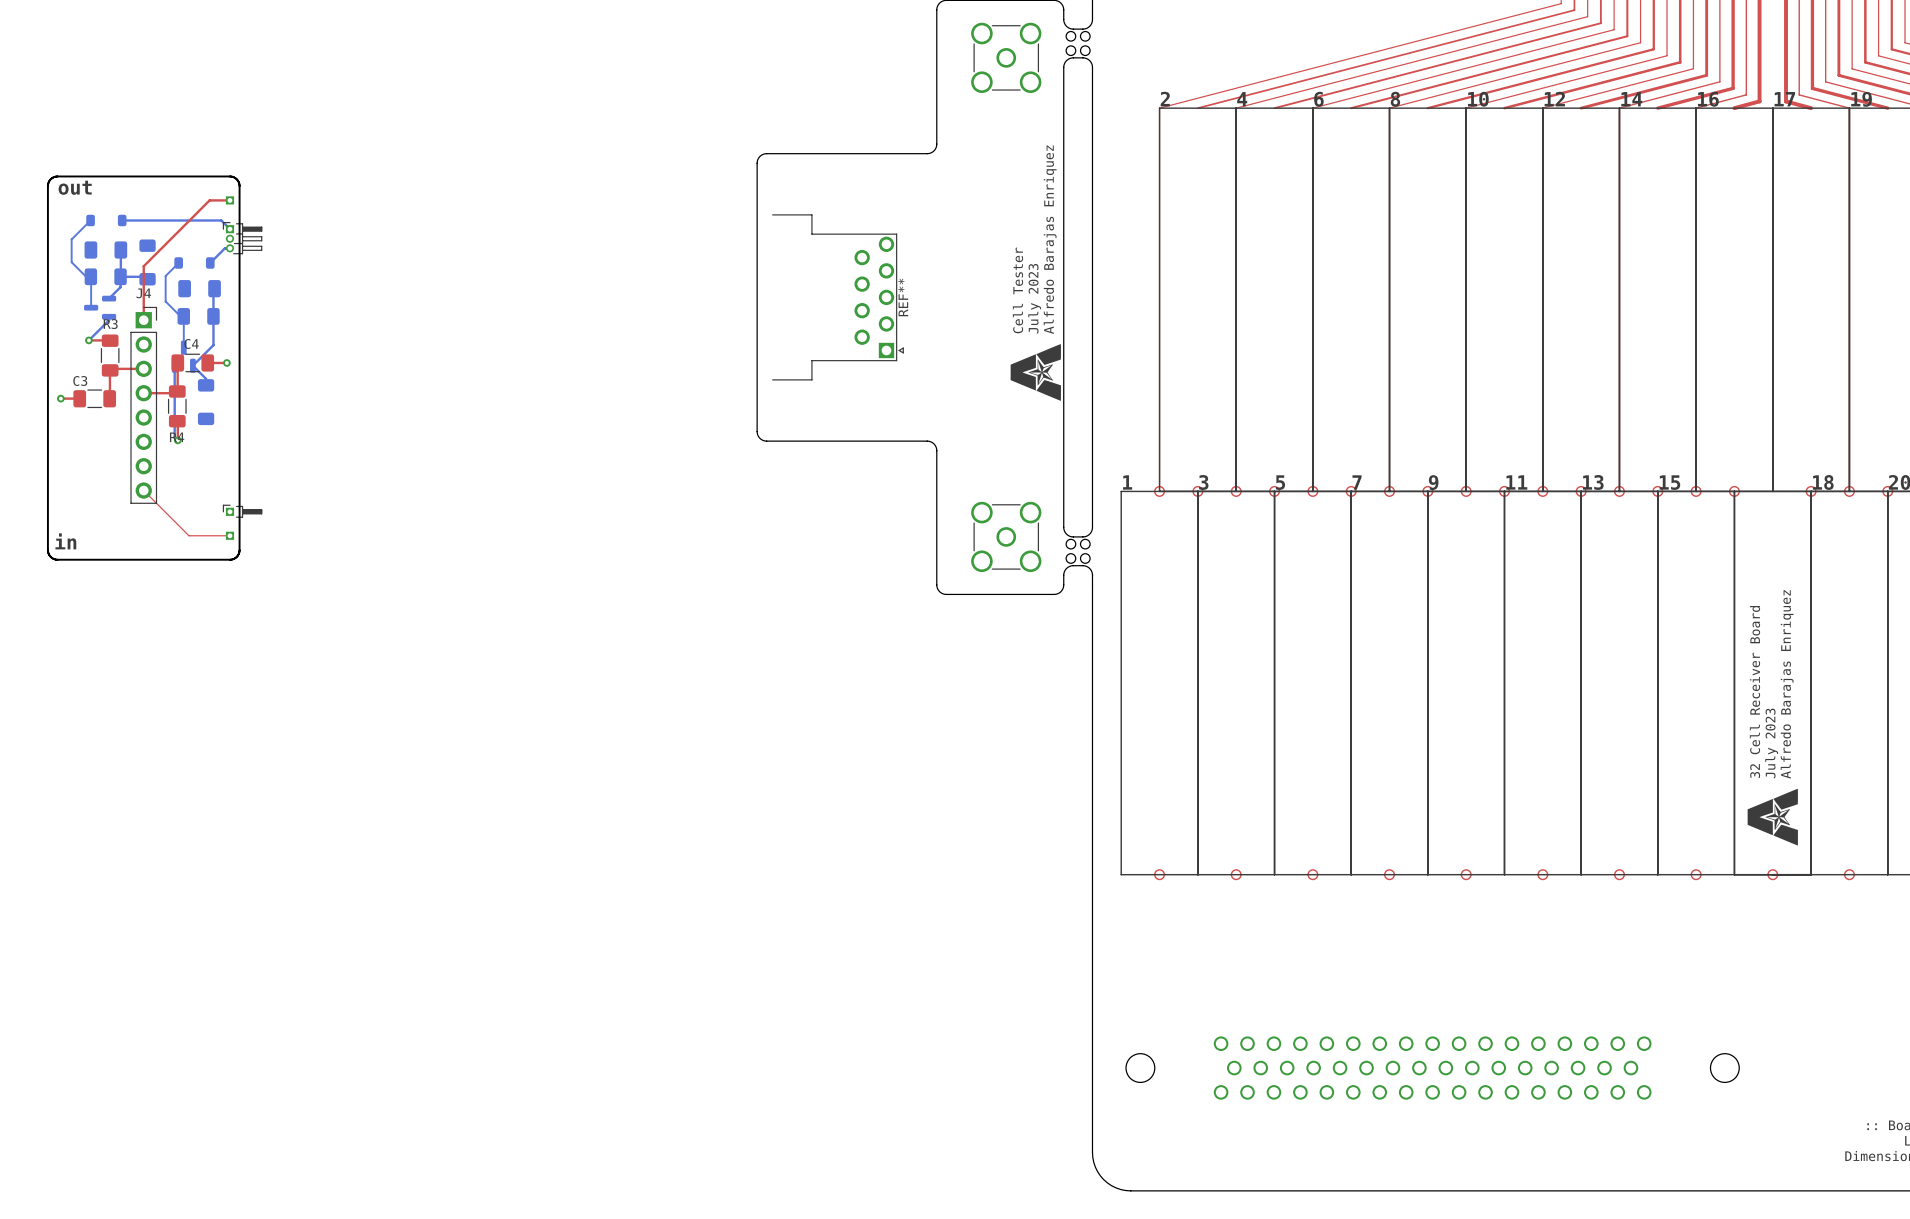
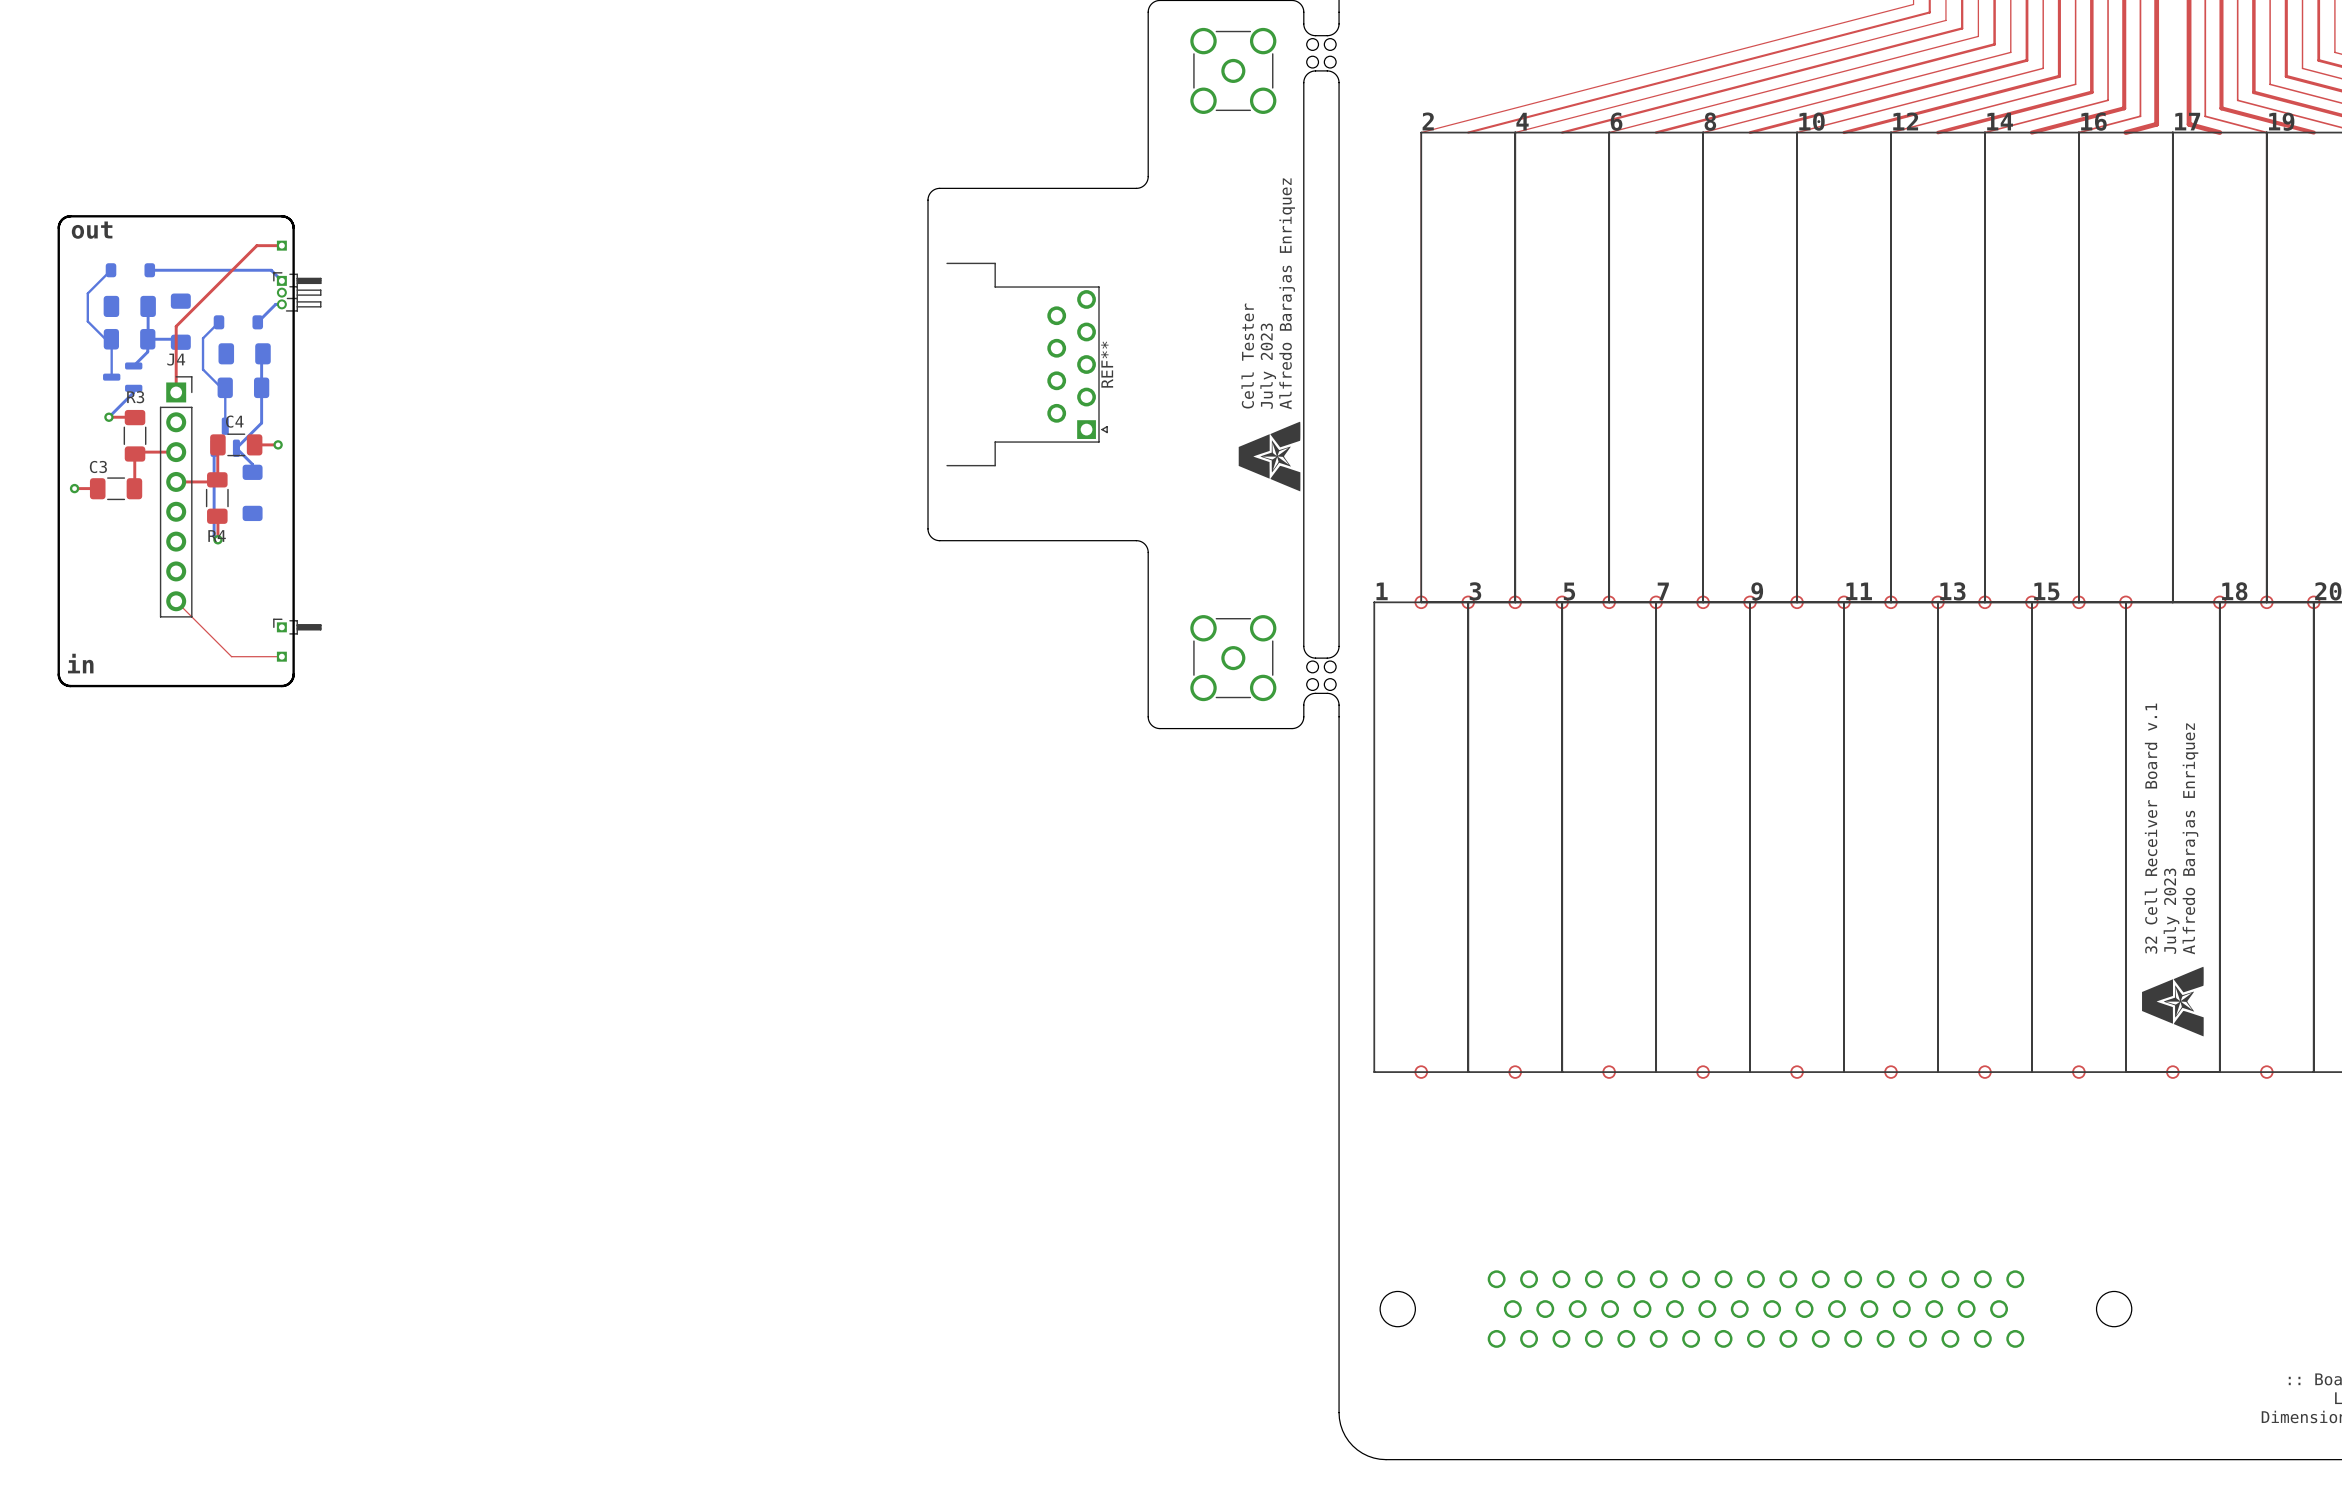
text: 32 Cell Receiver Board (1754, 692) -> 32 Cell Receiver Board v.1 (2151, 828)

